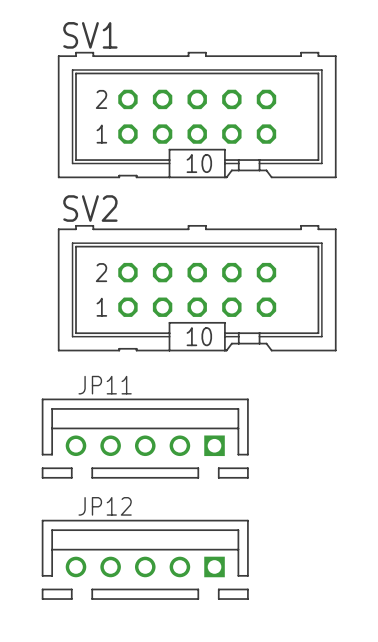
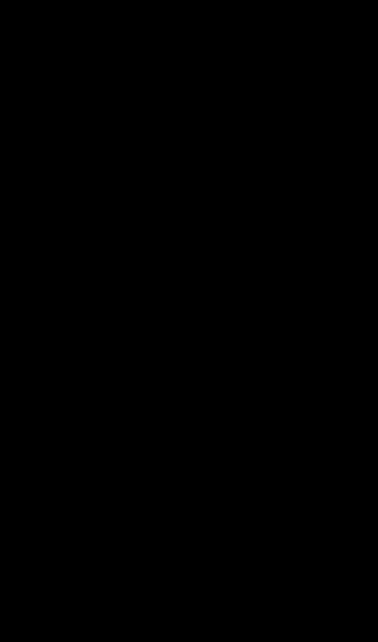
SV1: (197, 115) -> none
SV2: (197, 288) -> none
JP11: (145, 438) -> none
JP12: (145, 559) -> none

